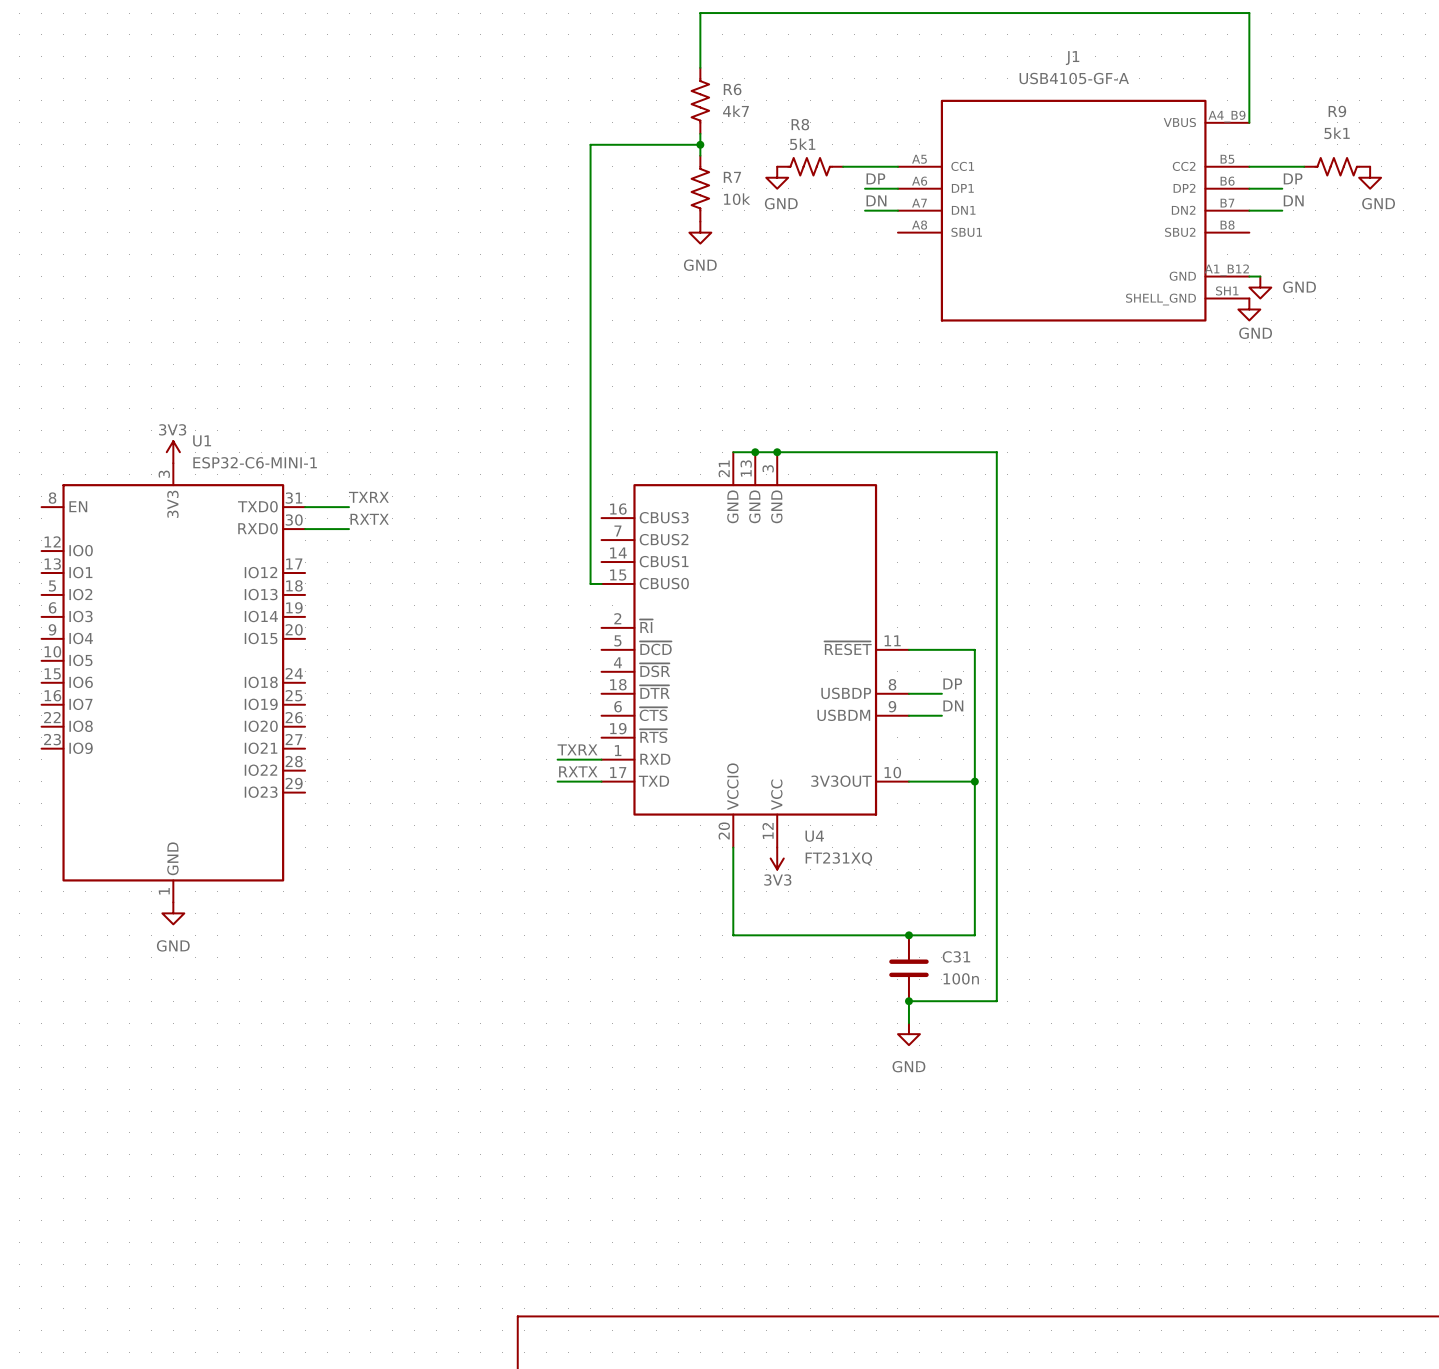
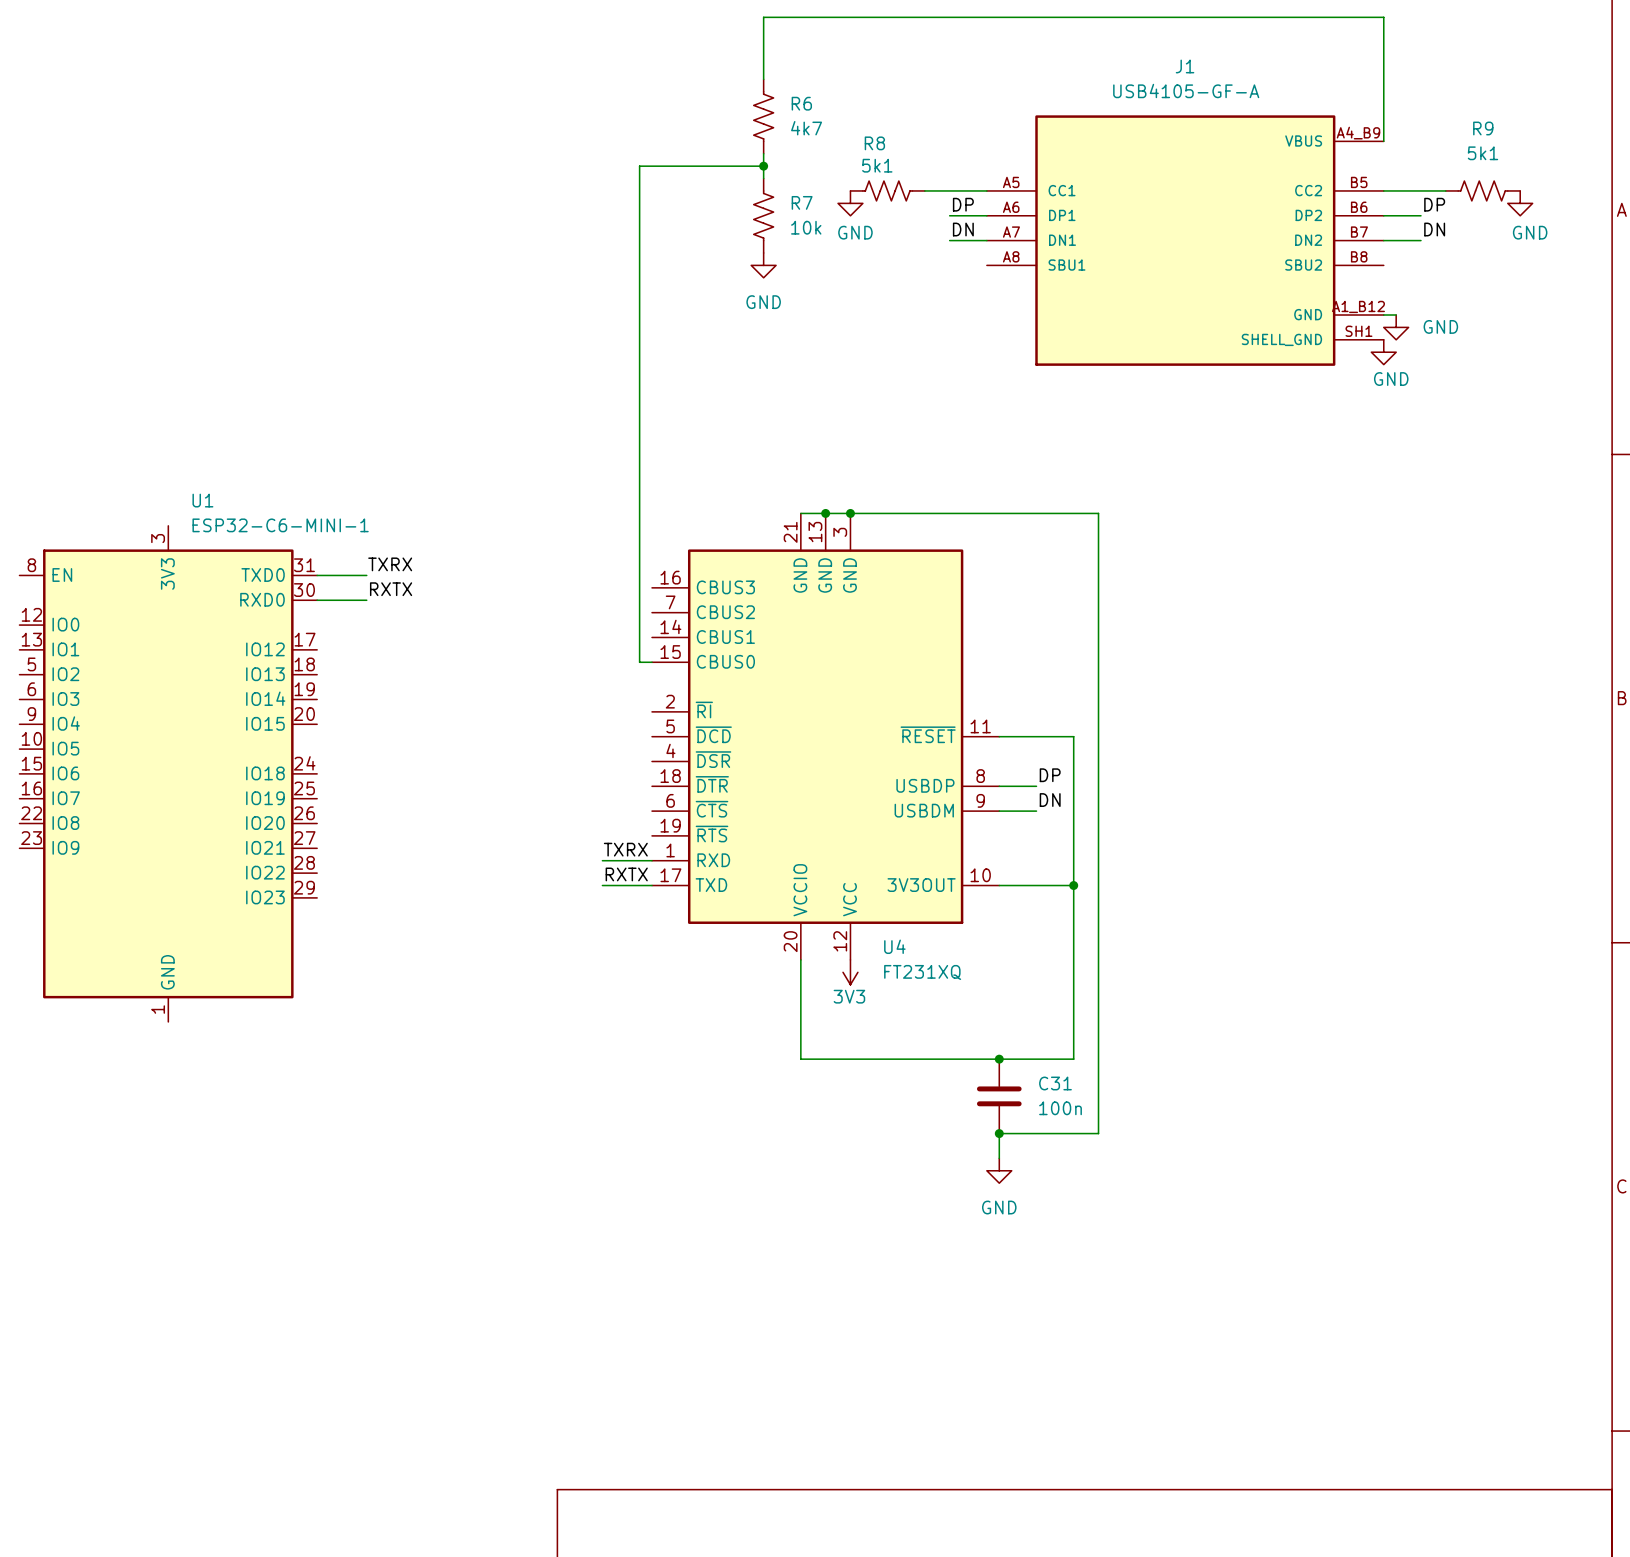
power symbol: 3V3 (173, 452) -> none
power symbol: GND (173, 913) -> none

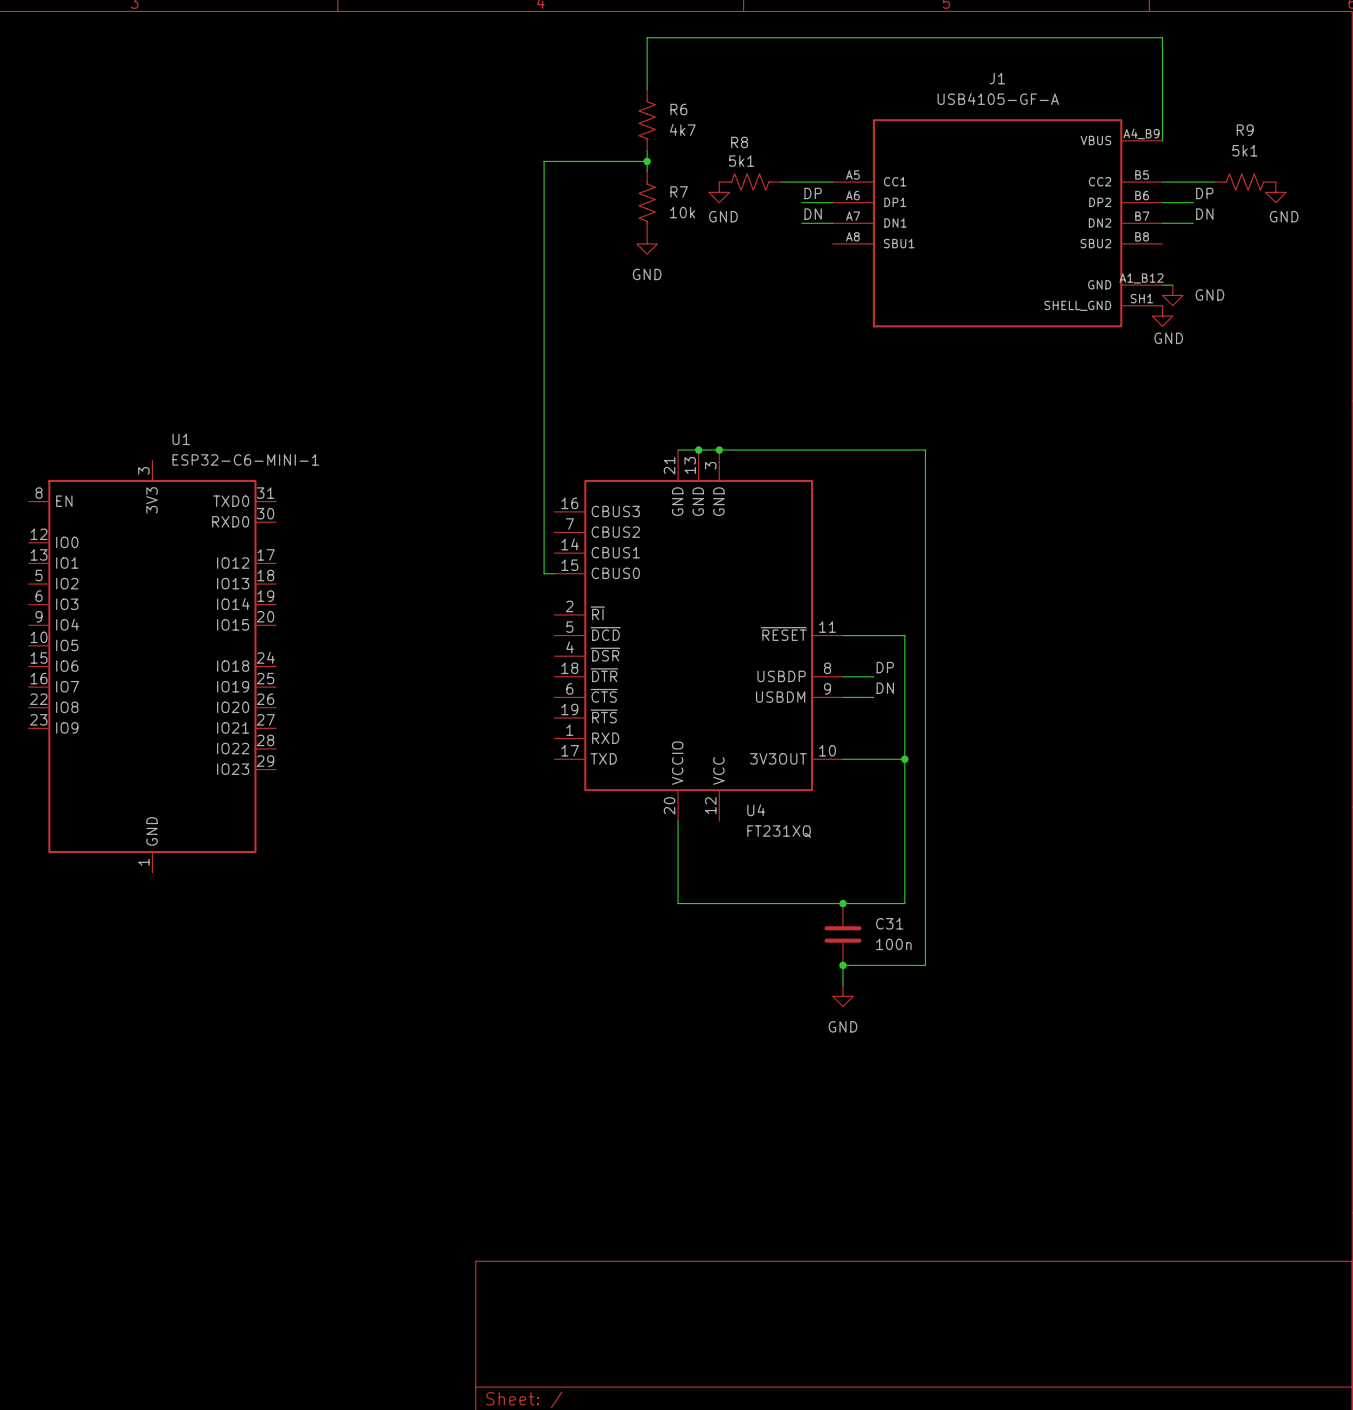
label: TXRX (390, 564) -> none
wire: (317, 575) (366, 575) -> none
label: RXTX (391, 589) -> none
wire: (317, 600) (366, 600) -> none
label: TXRX (625, 849) -> none
wire: (602, 860) (652, 860) -> none
label: RXTX (626, 874) -> none
wire: (602, 885) (652, 885) -> none
power symbol: 3V3 (850, 972) -> none

